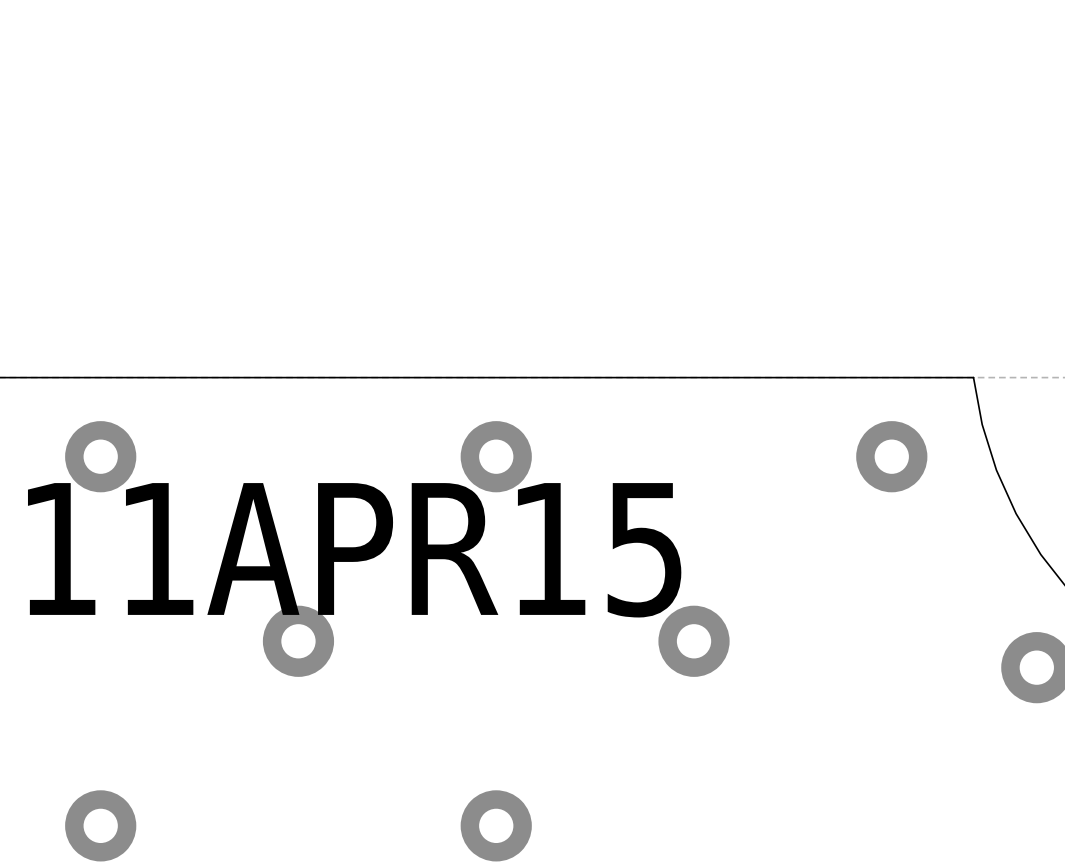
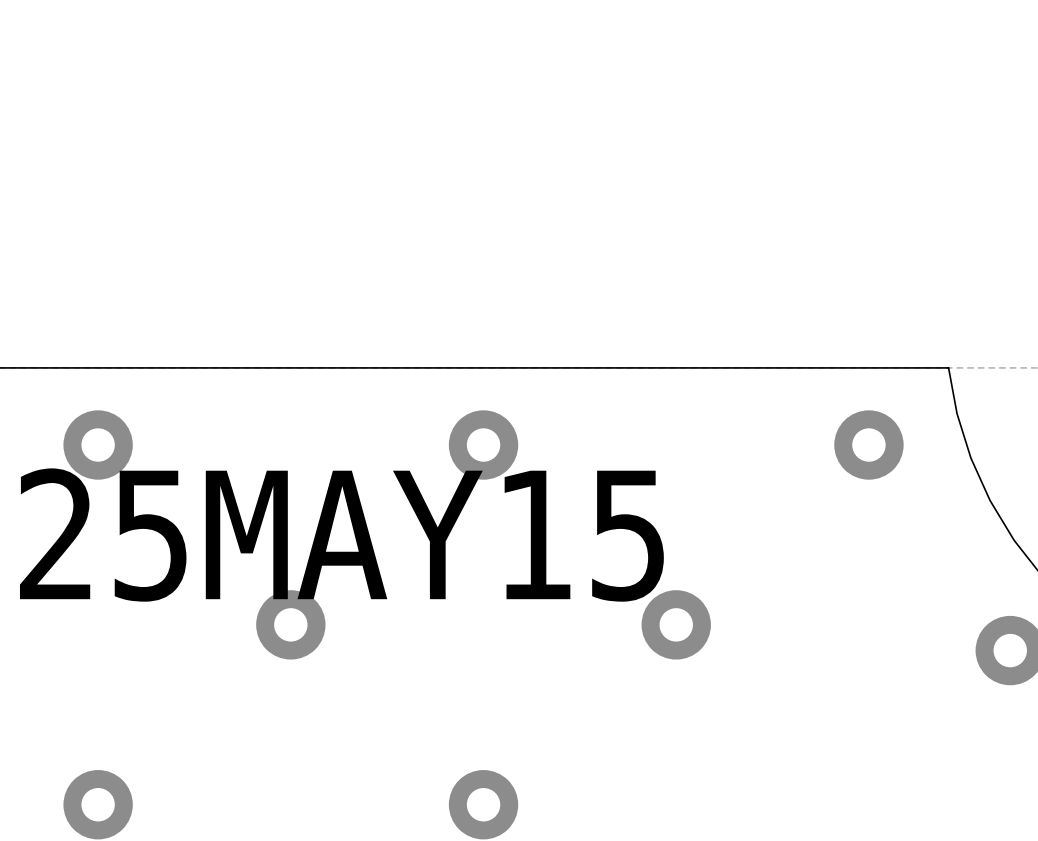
text: 11APR15 (354, 550) -> 25MAY15 (341, 535)

